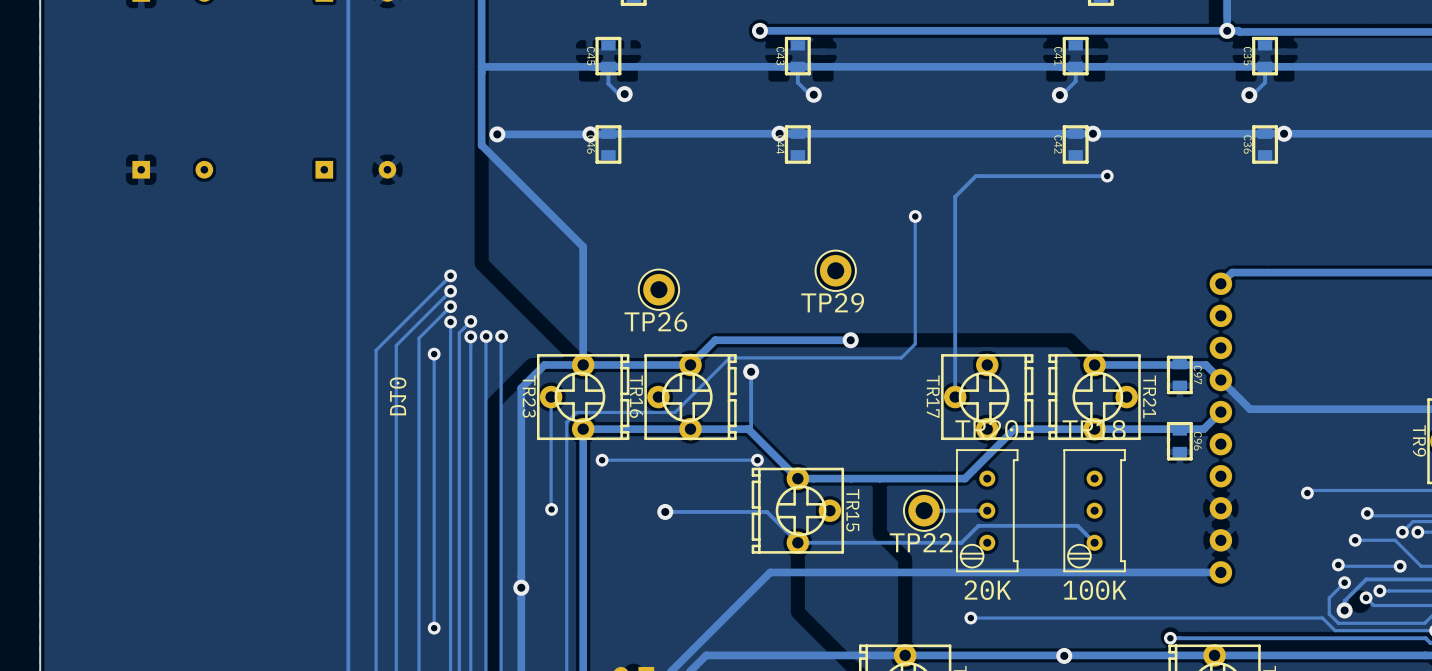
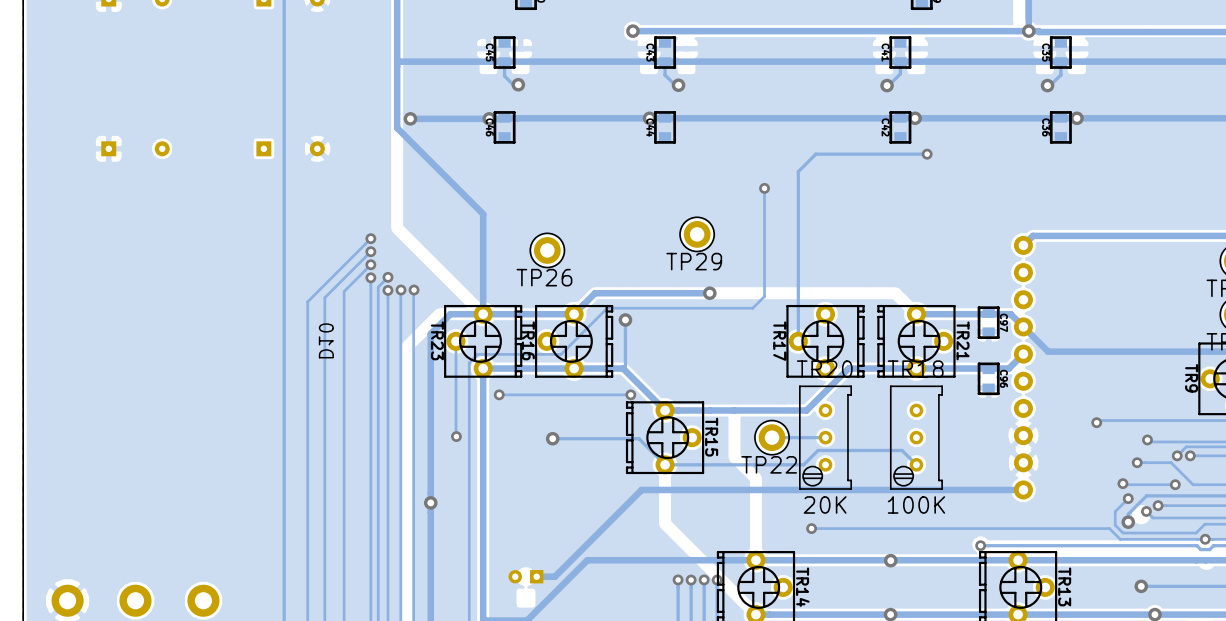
track: (434, 354) (434, 628) -> none
via: (434, 354) -> none
via: (434, 628) -> none

